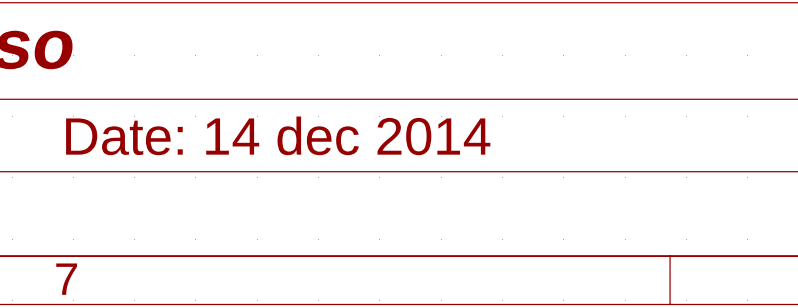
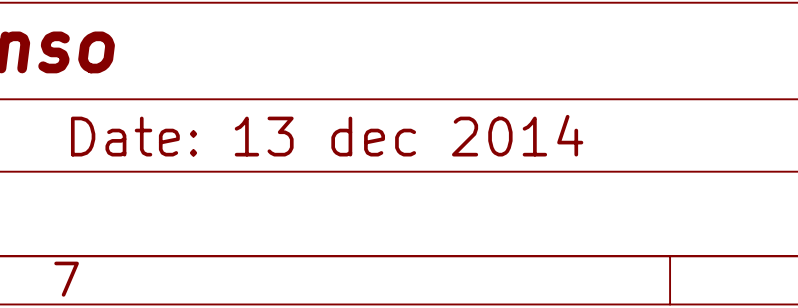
title block: Date: 14 dec 2014 (278, 135) -> Date: 13 dec 2014 (327, 135)

